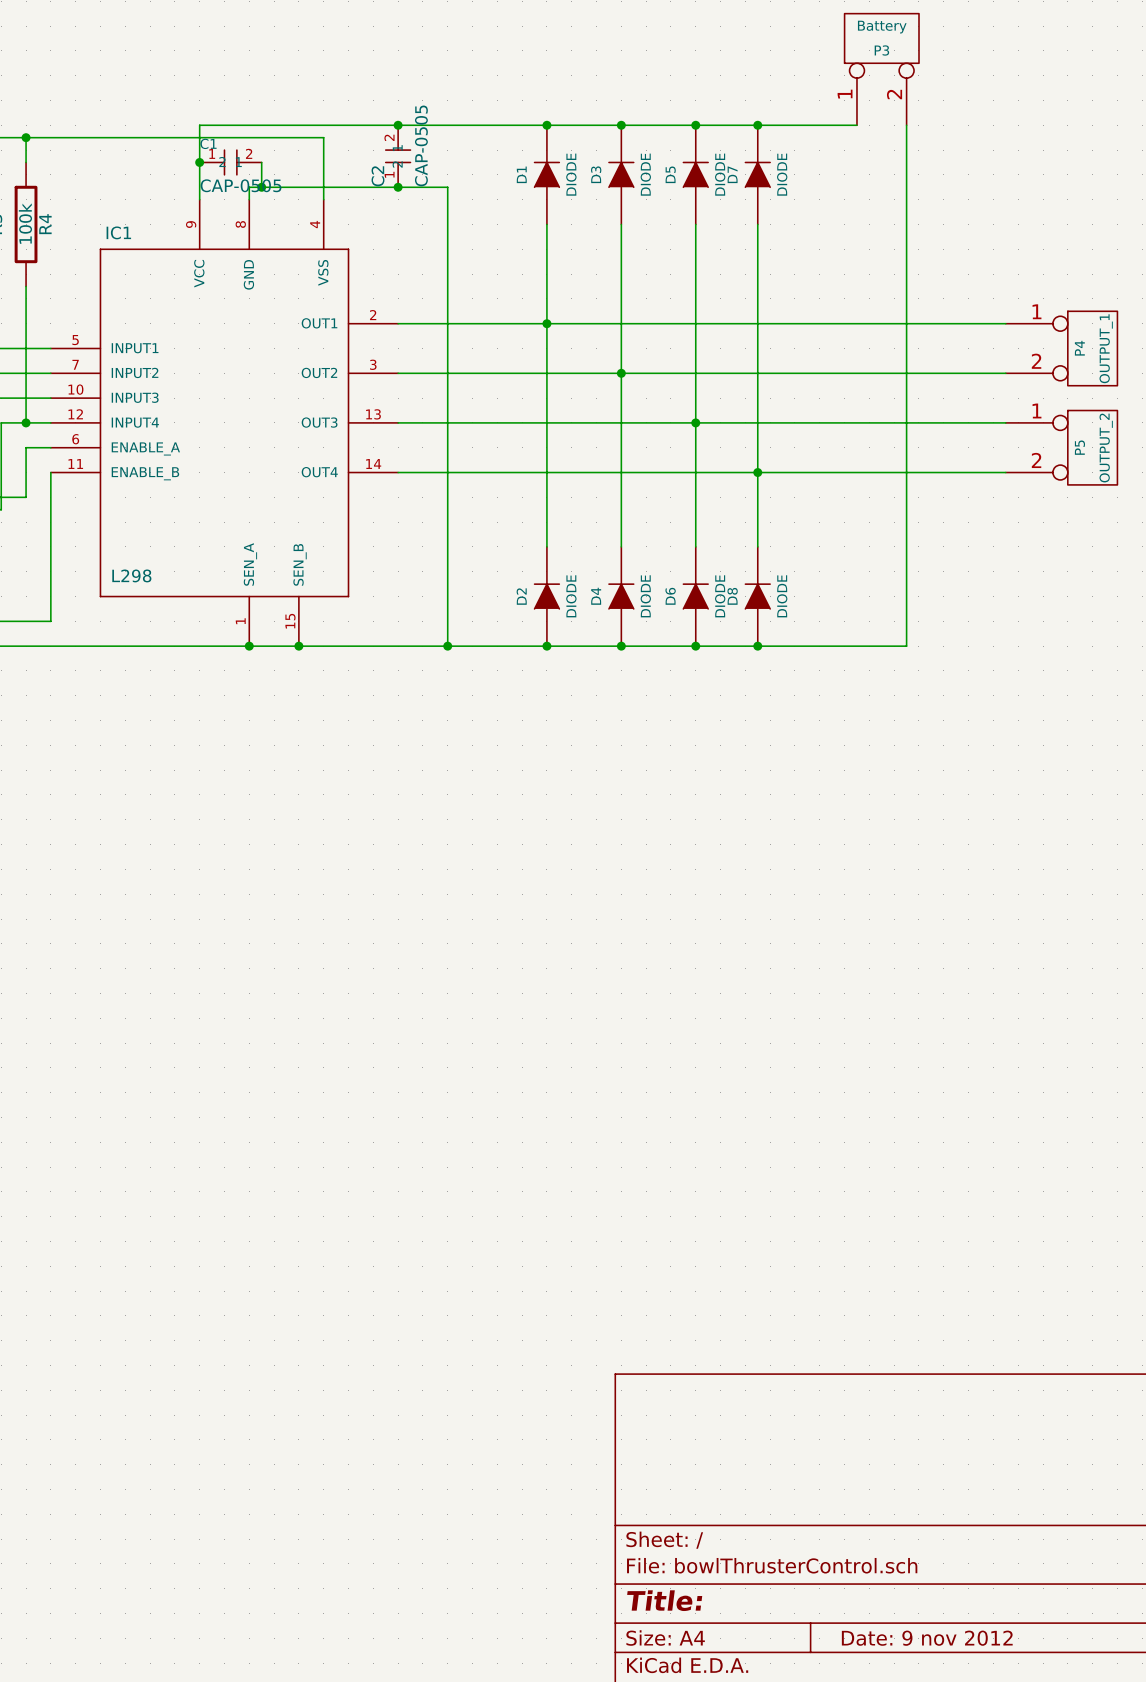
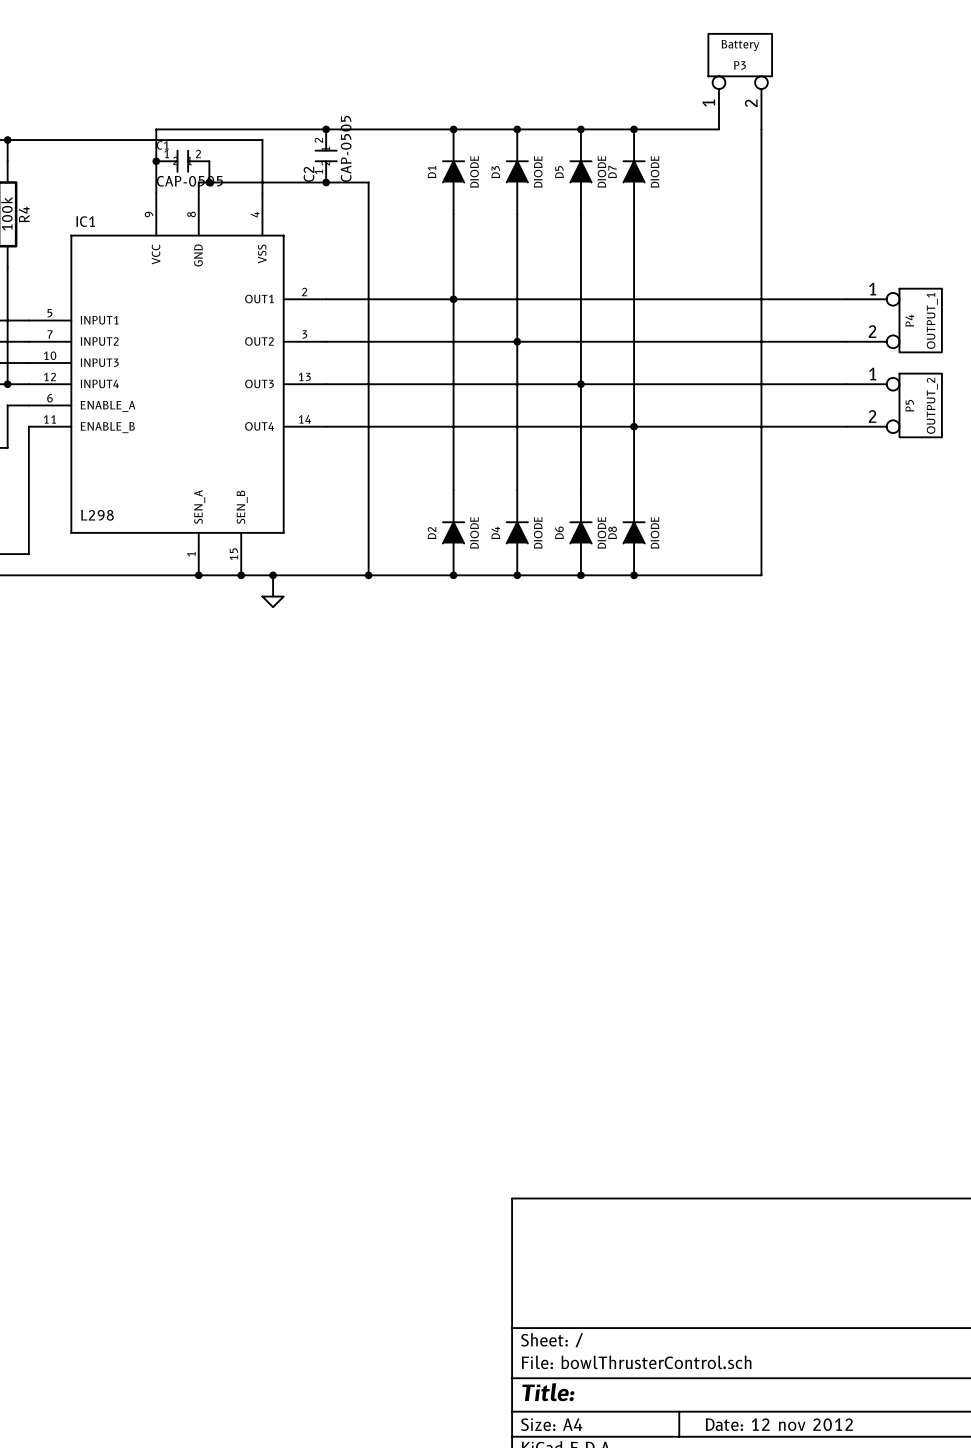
wire: none -> (273, 575) (273, 596)
junction: none -> (273, 575)
power symbol: none -> (273, 601)
title block: Date: 9 nov 2012 (927, 1638) -> Date: 12 nov 2012 (779, 1424)

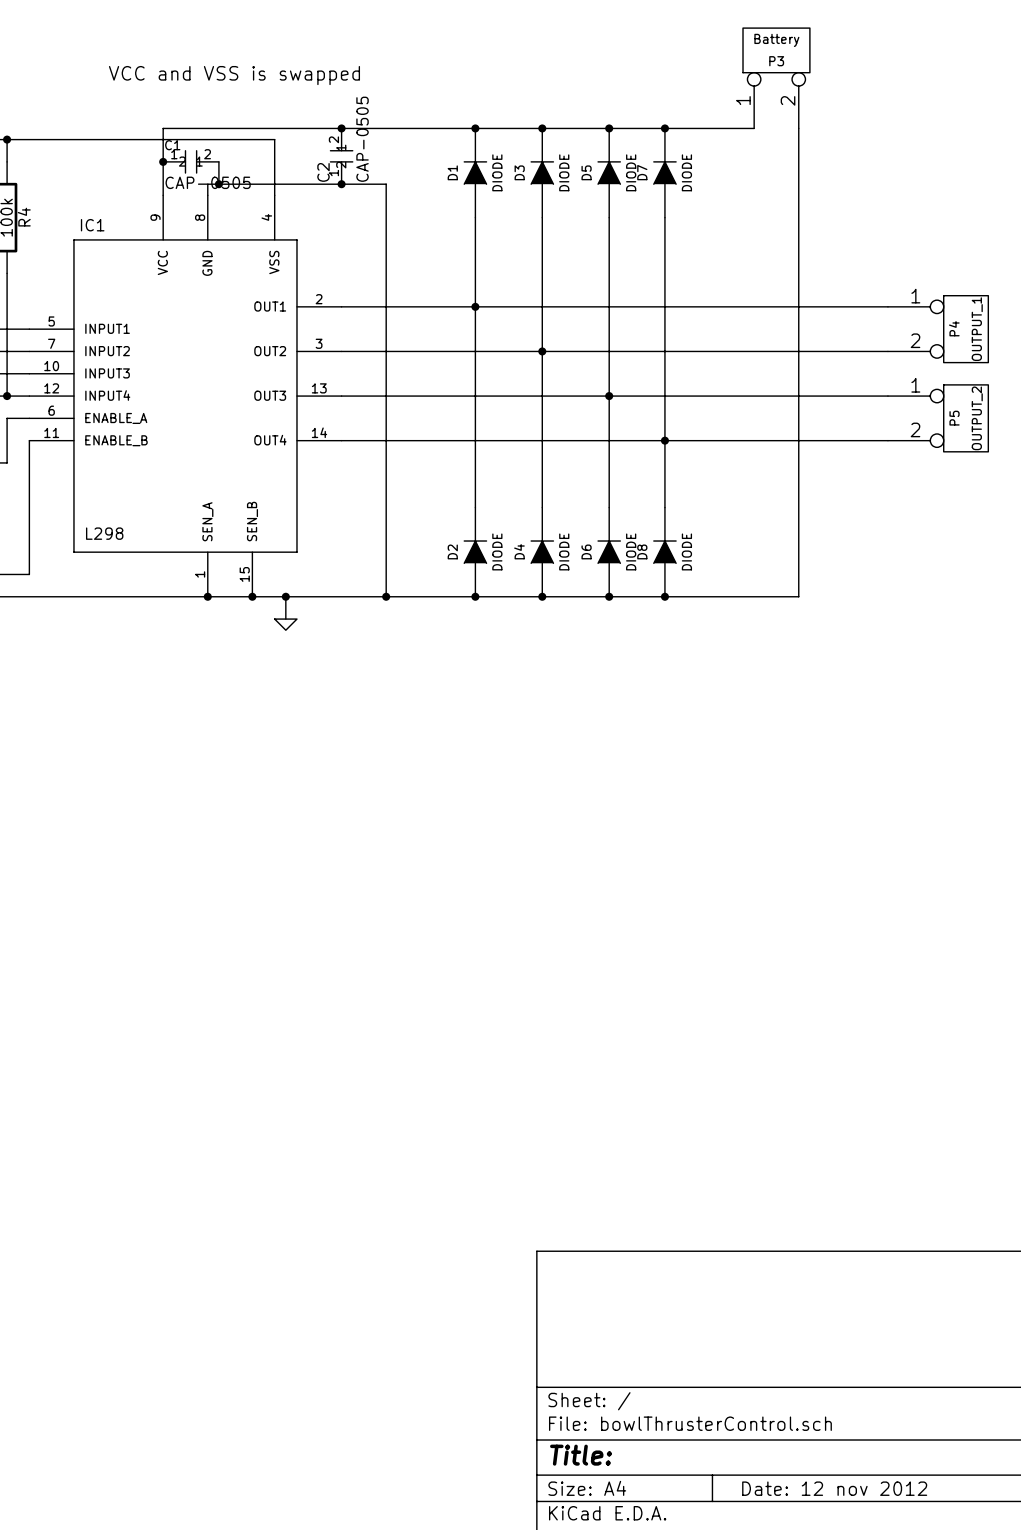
text: none -> VCC and VSS is swapped (234, 75)

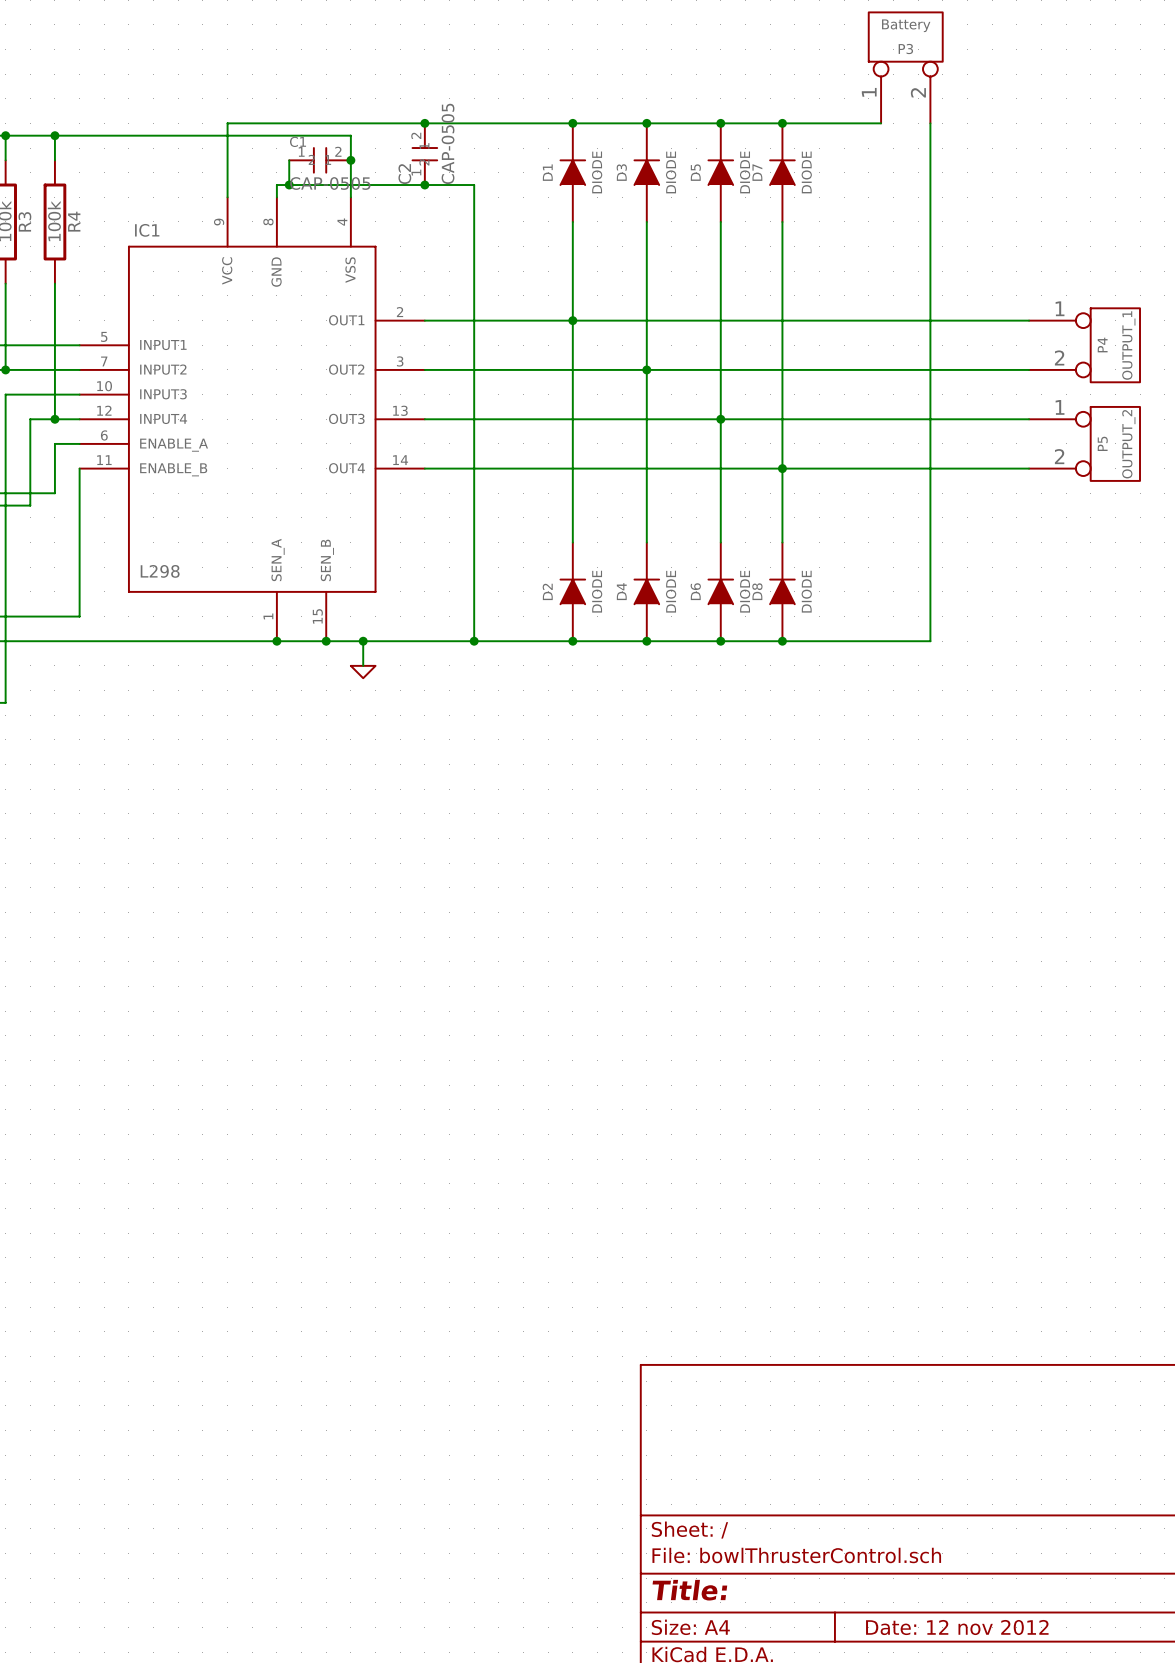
text: VCC and VSS is swapped (234, 75) -> none
junction: (163, 161) -> none
C1 position: (191, 161) -> (320, 160)
junction: none -> (350, 160)

